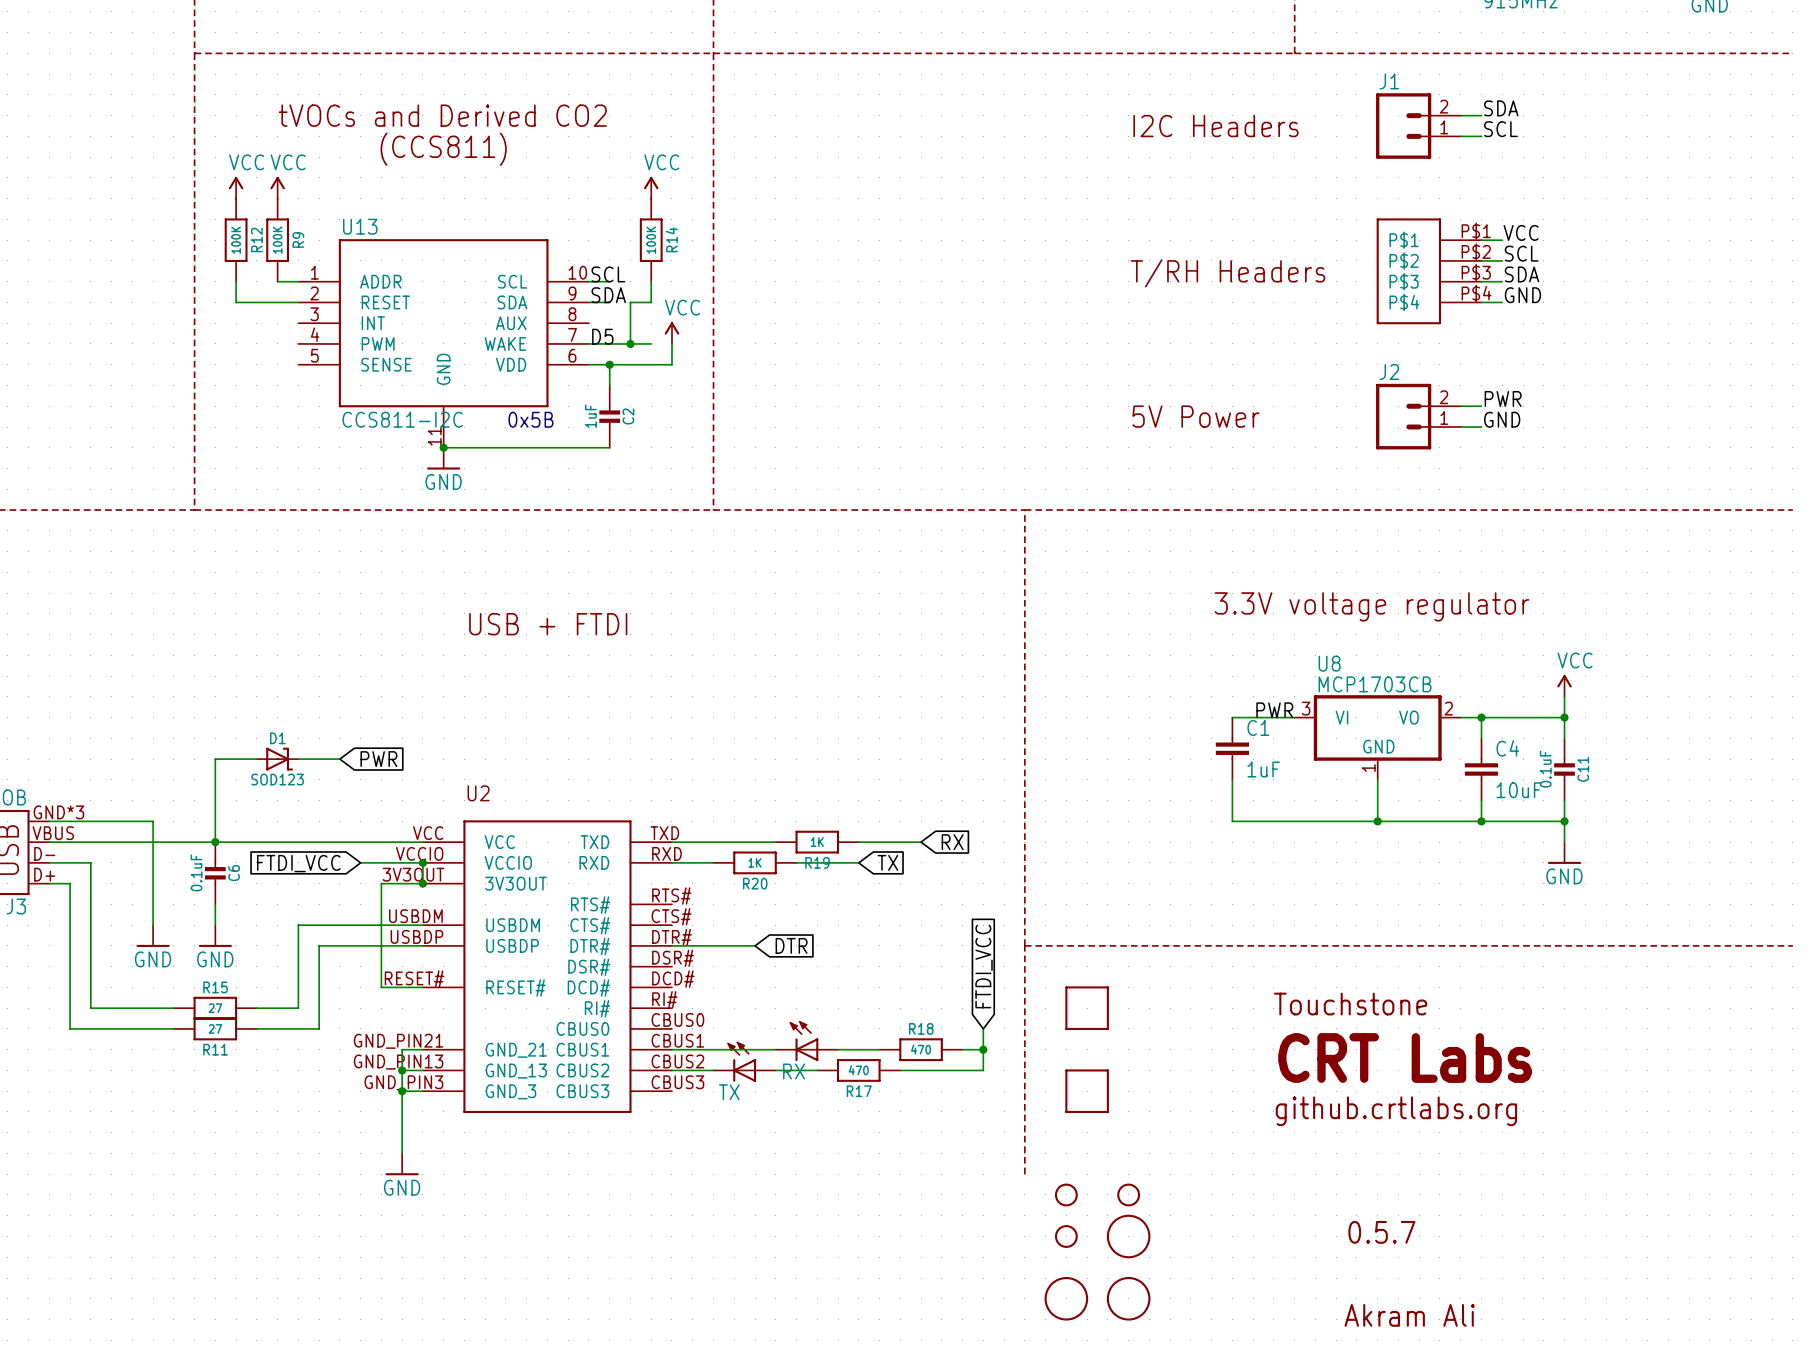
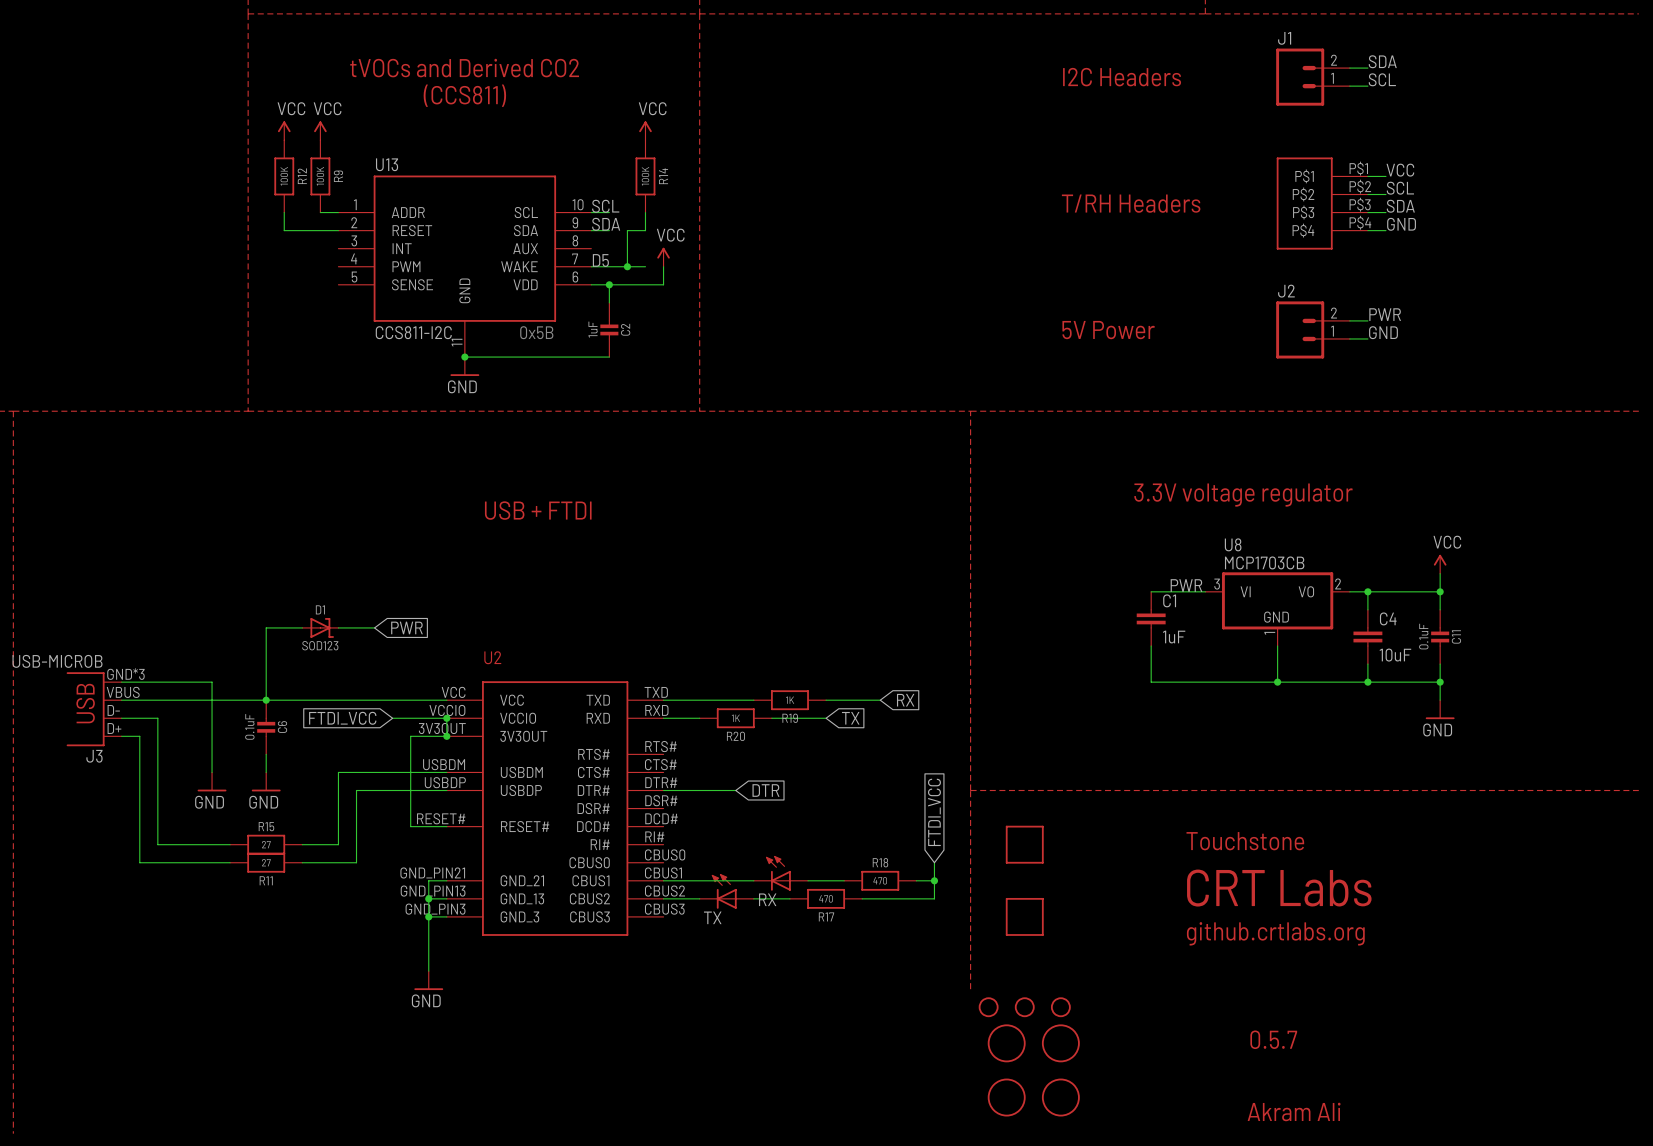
part: none -> (988, 1007)
part: (1066, 1194) -> none
part: none -> (1024, 1007)
part symbol: [1054, 1225, 1078, 1248] -> [987, 1024, 1026, 1063]

